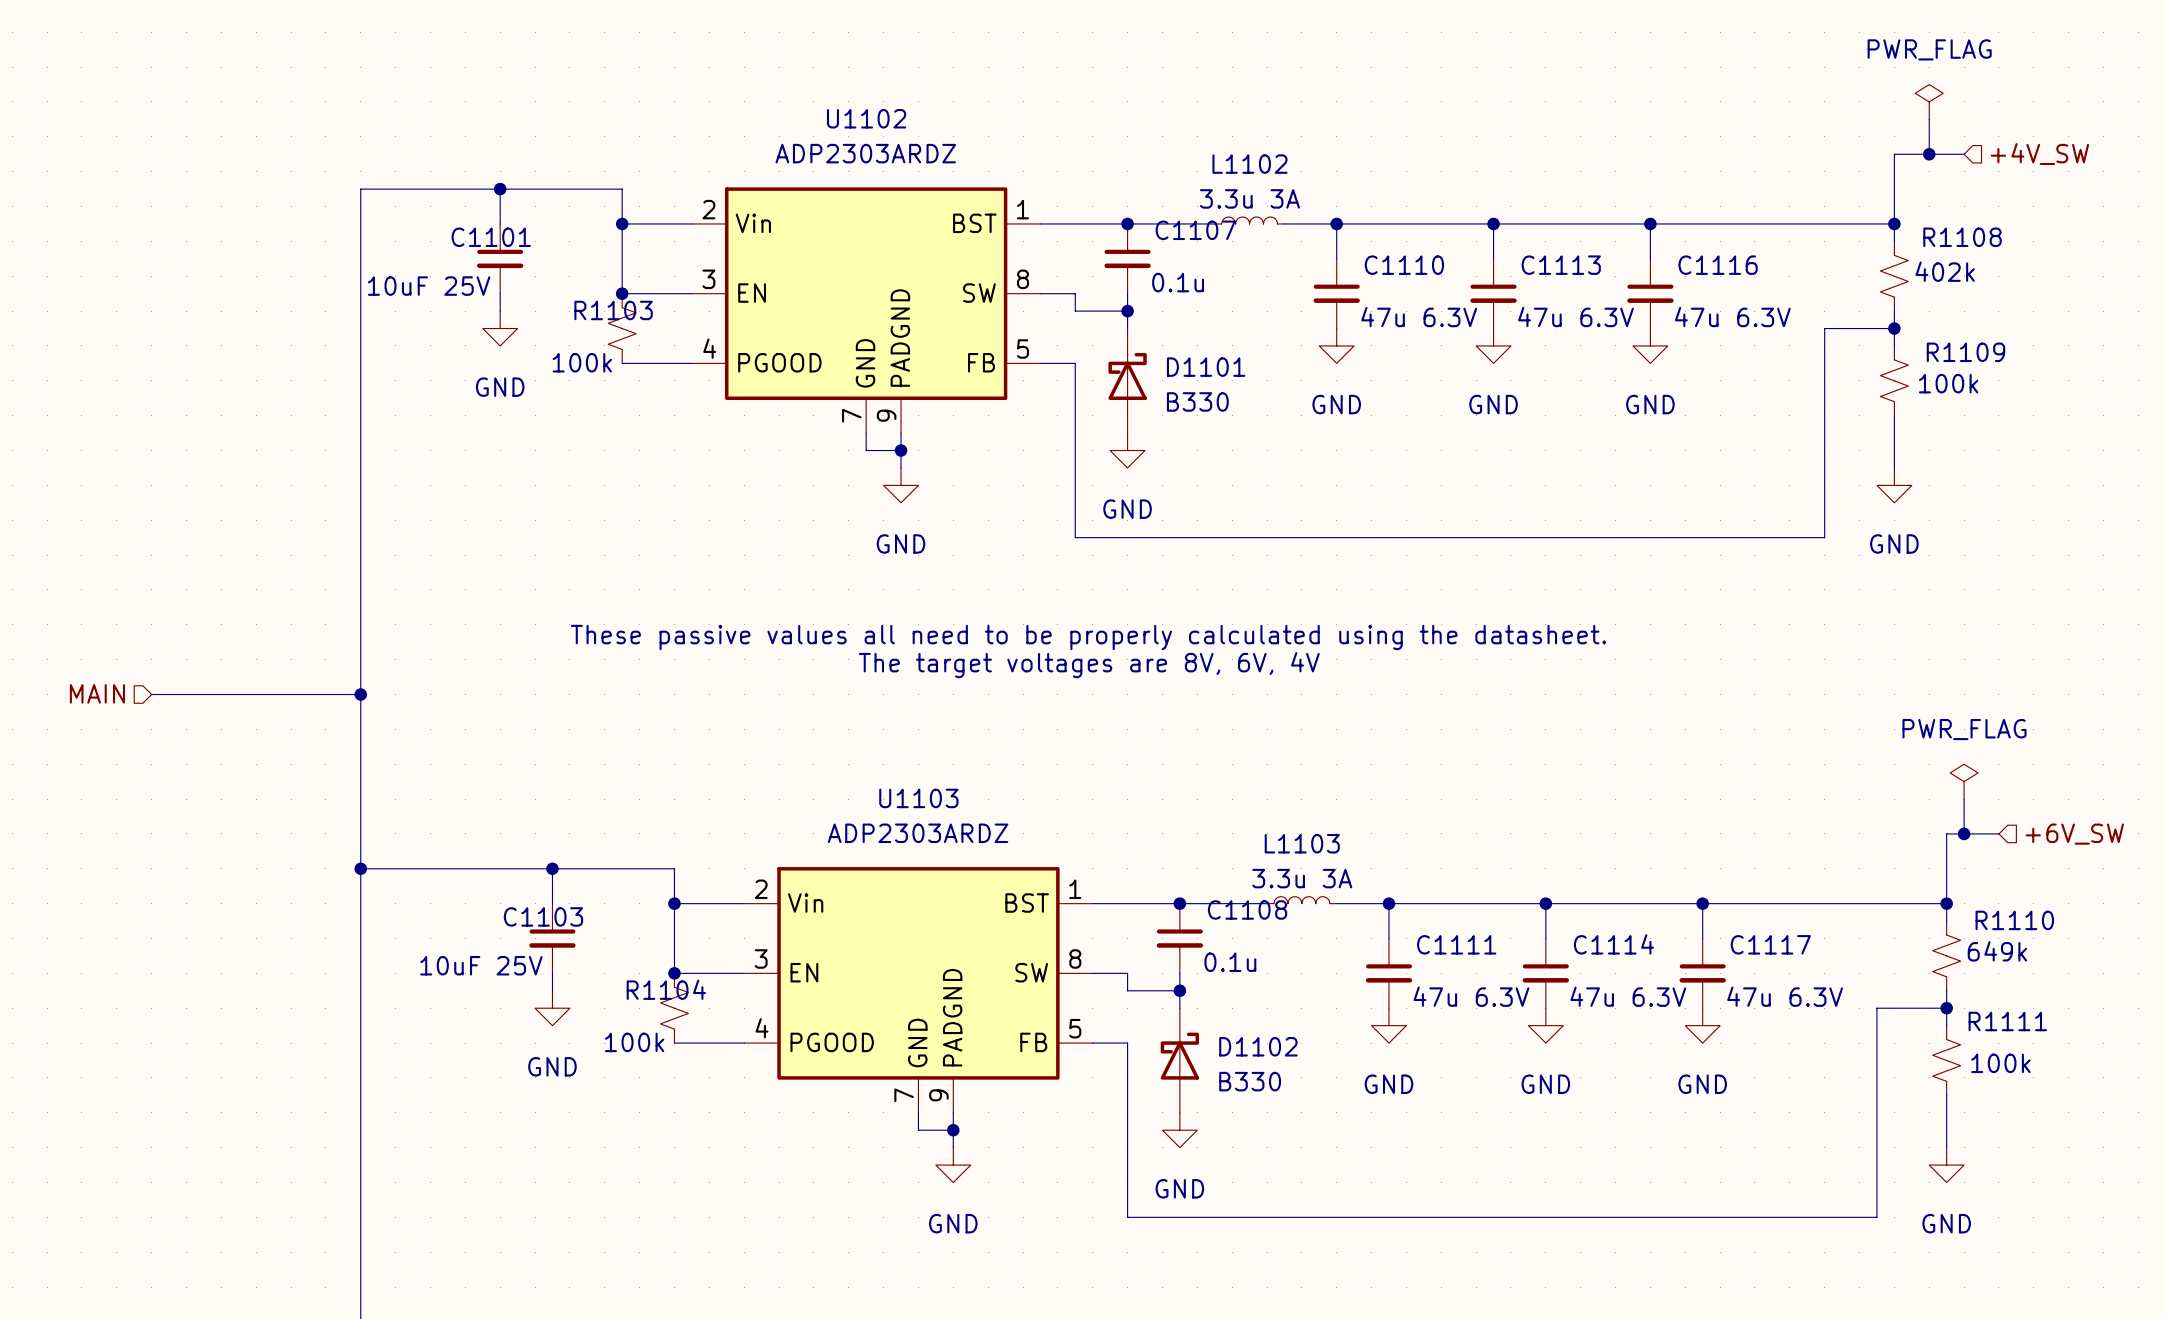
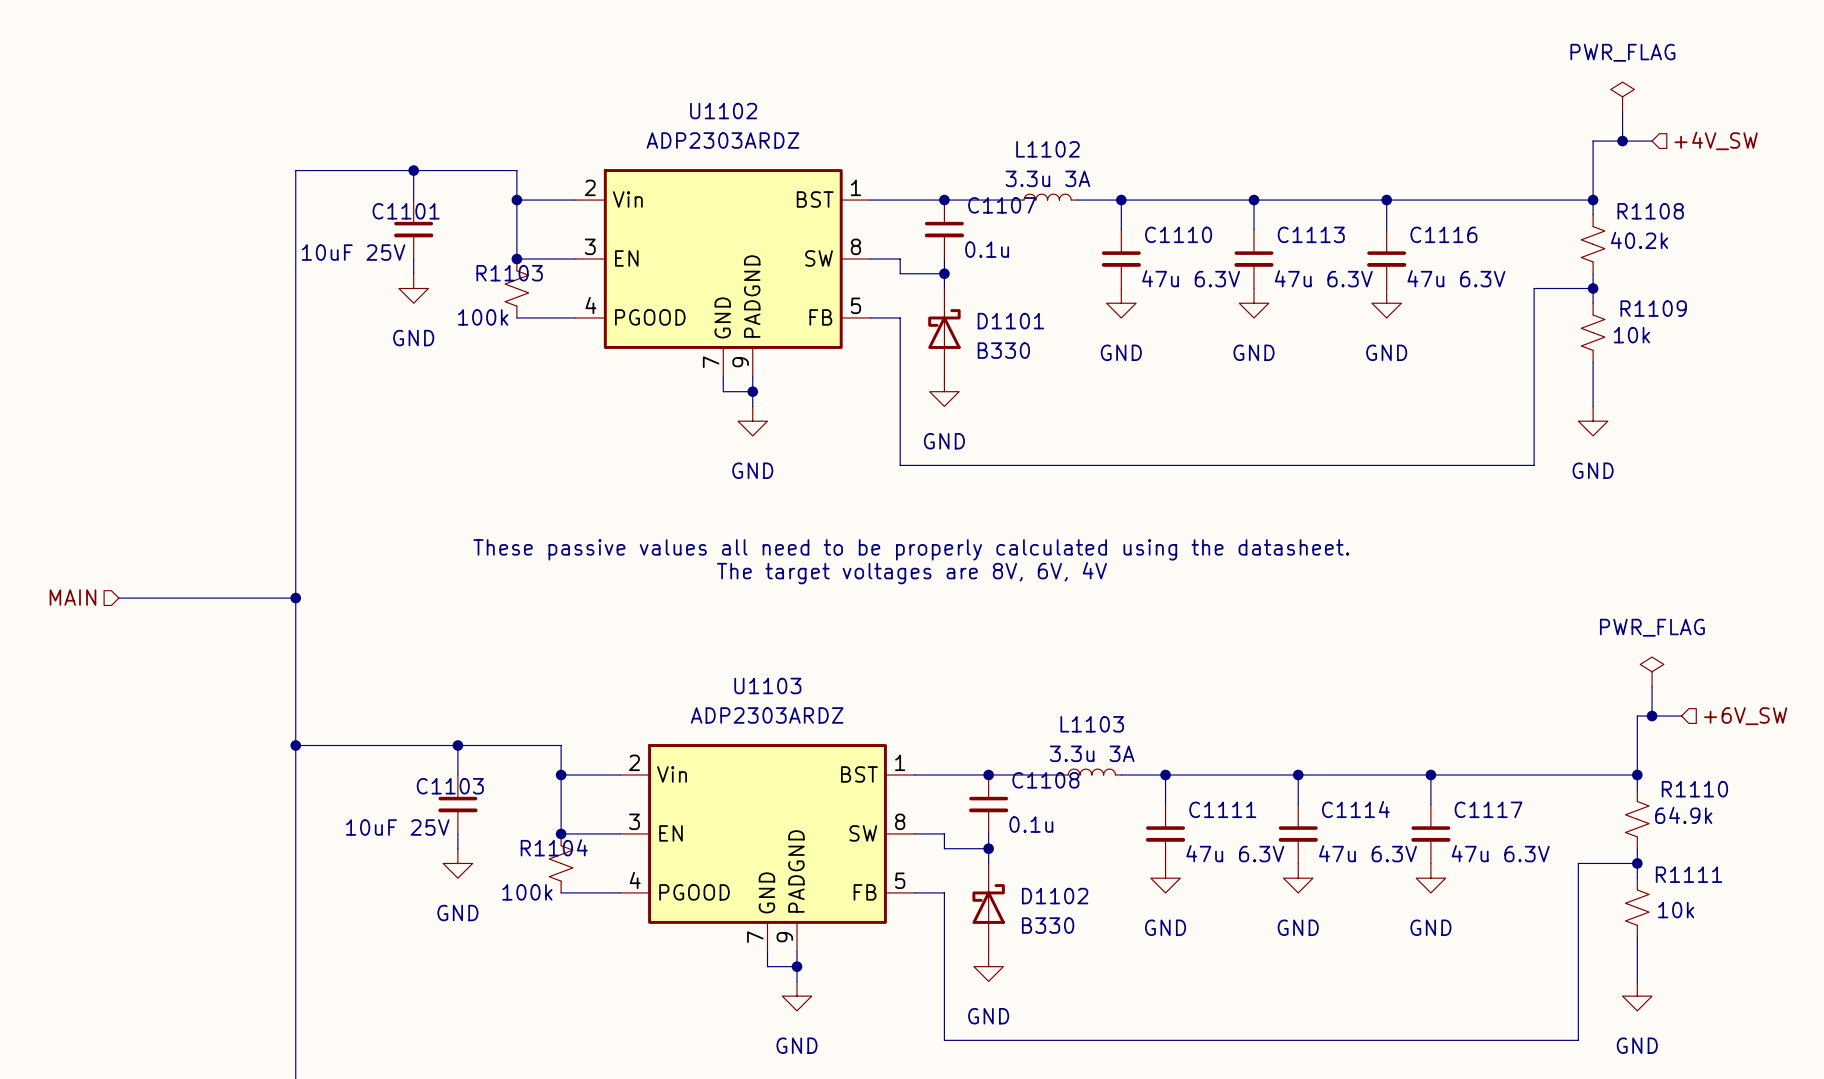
R1108 value: 402k (1945, 271) -> 40.2k (1639, 240)
R1109 value: 100k (1948, 383) -> 10k (1631, 335)
R1110 value: 649k (1997, 951) -> 64.9k (1683, 815)
R1111 value: 100k (2000, 1063) -> 10k (1676, 910)

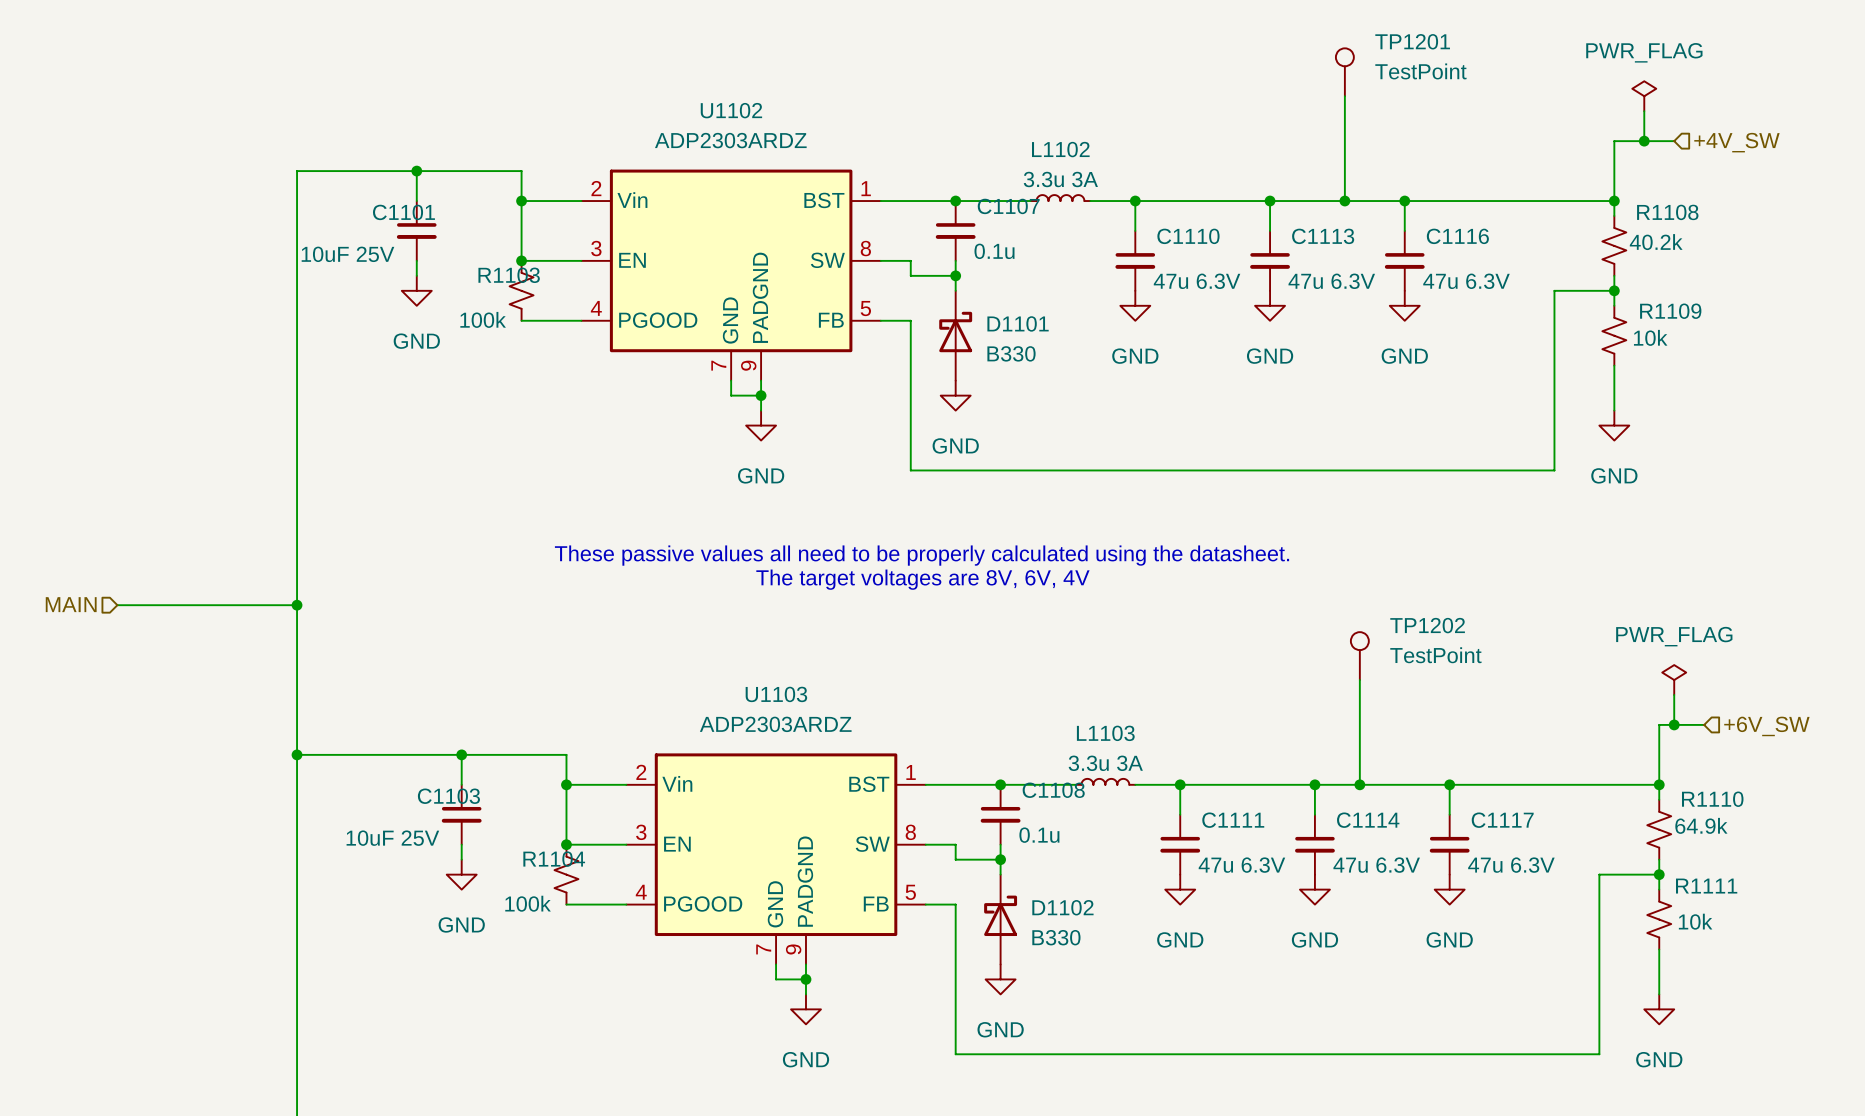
TP1201: none -> TestPoint (1344, 72)
wire: none -> (1344, 96) (1344, 201)
junction: none -> (1344, 201)
TP1202: none -> TestPoint (1359, 656)
wire: none -> (1359, 680) (1359, 784)
junction: none -> (1359, 784)

